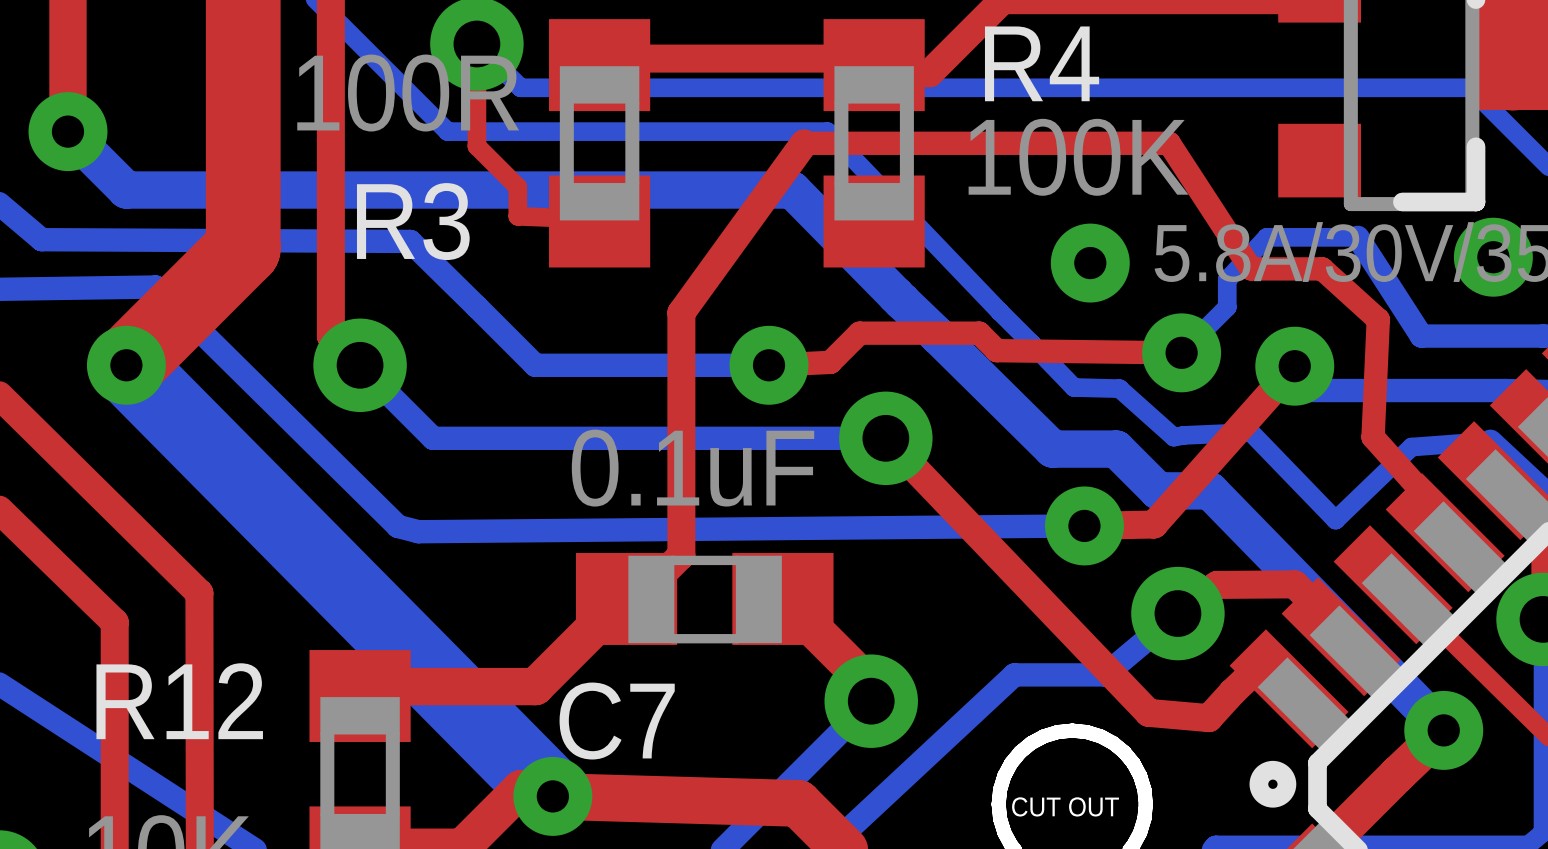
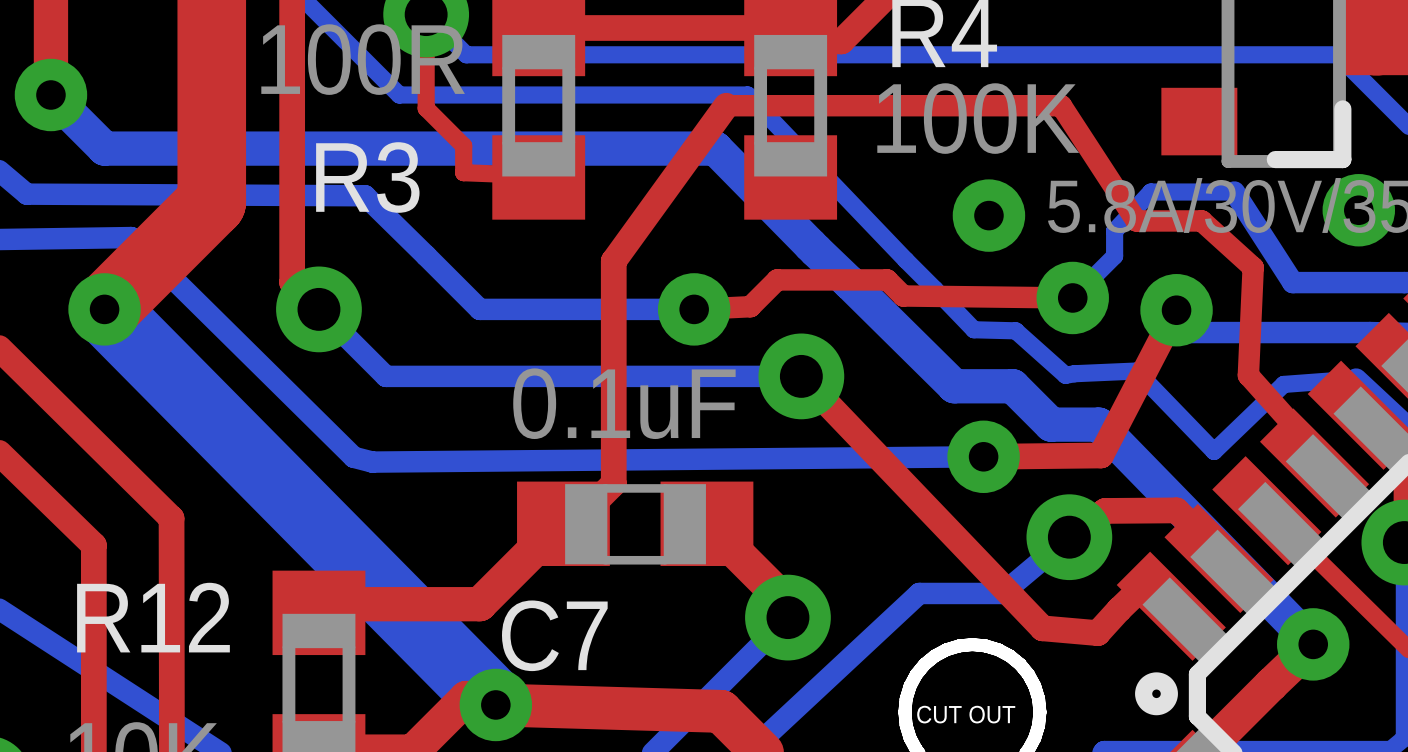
top track: (1294, 366) (1153, 524) (1084, 525) -> (1176, 310) (1100, 455) (983, 456)

